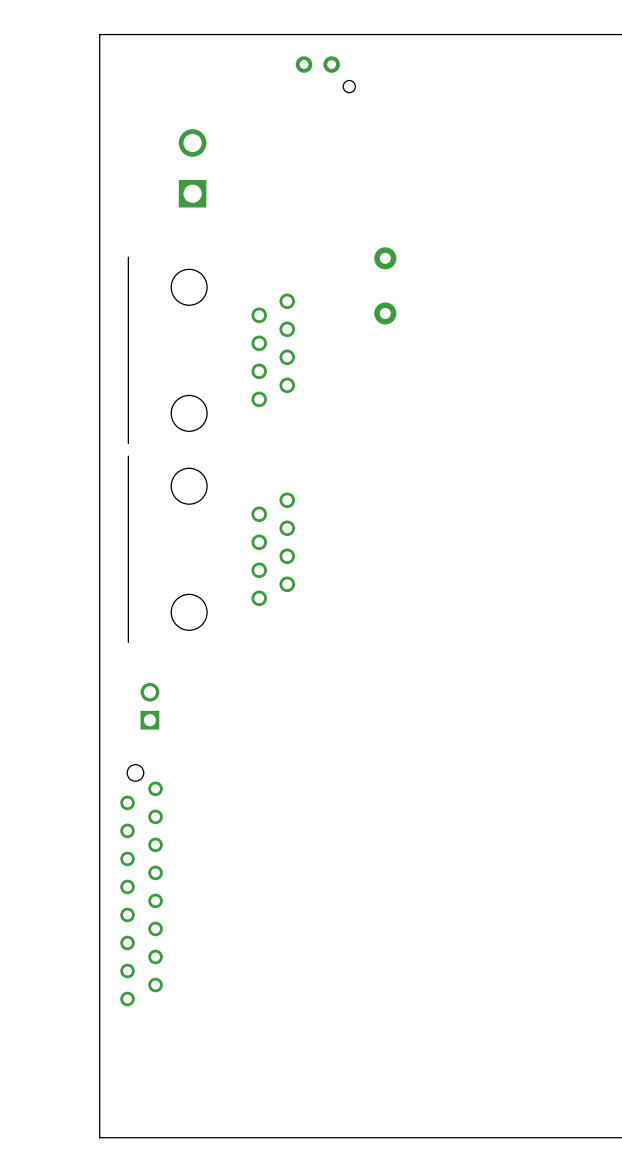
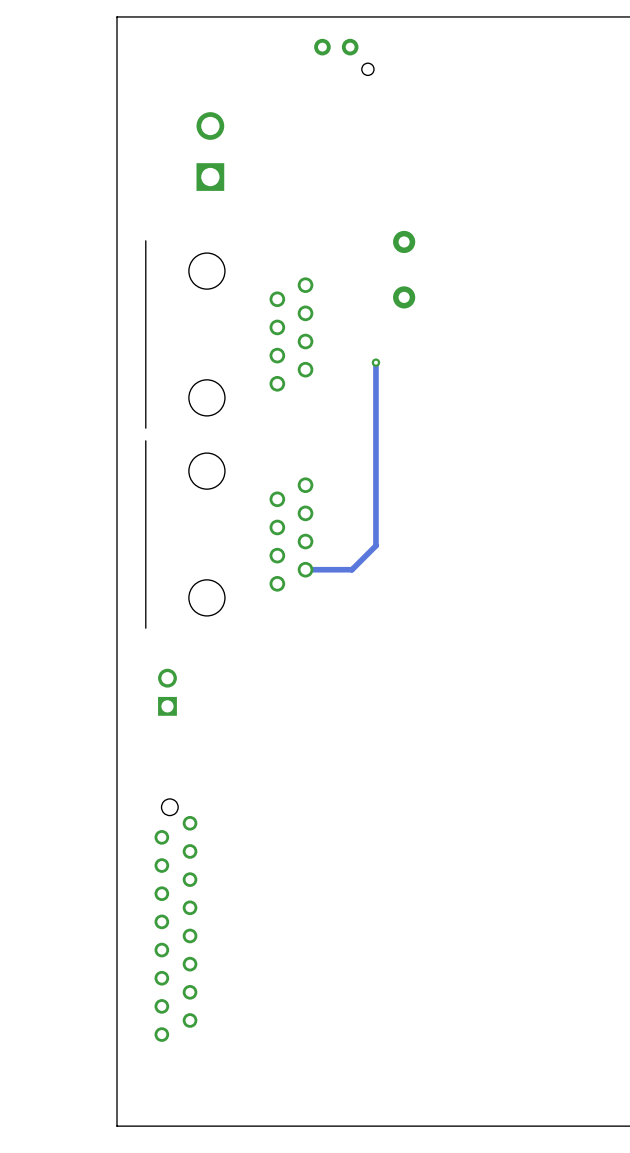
track: none -> (375, 362) (375, 545) (352, 569) (305, 569)
via: none -> (375, 362)
part position: (141, 885) -> (175, 920)

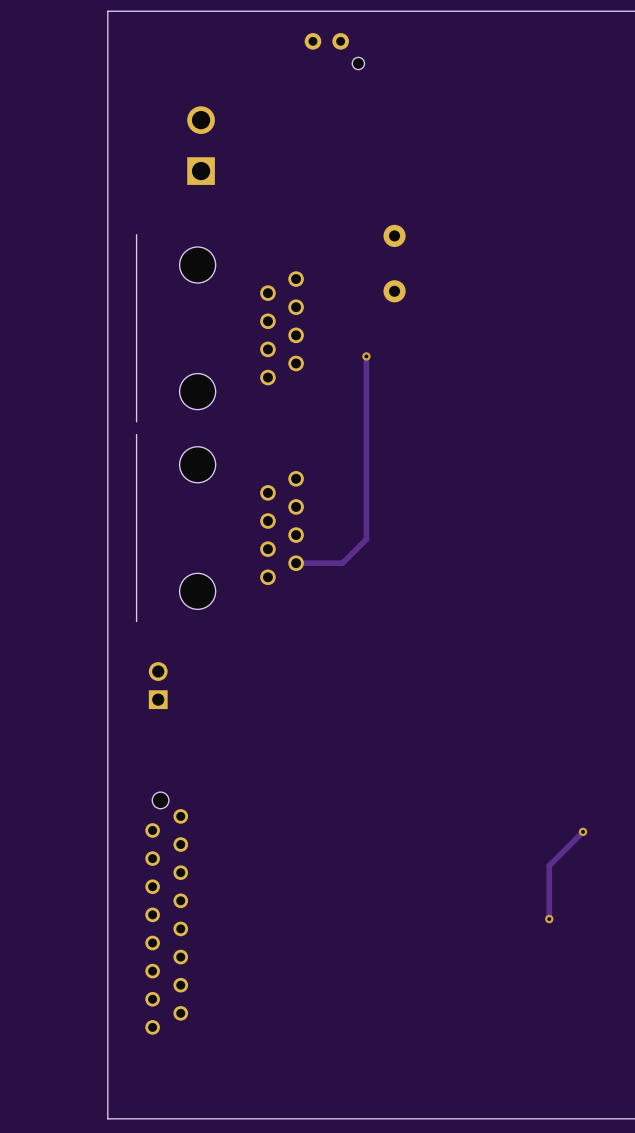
track: none -> (583, 831) (549, 865) (549, 919)
via: none -> (583, 831)
via: none -> (549, 919)

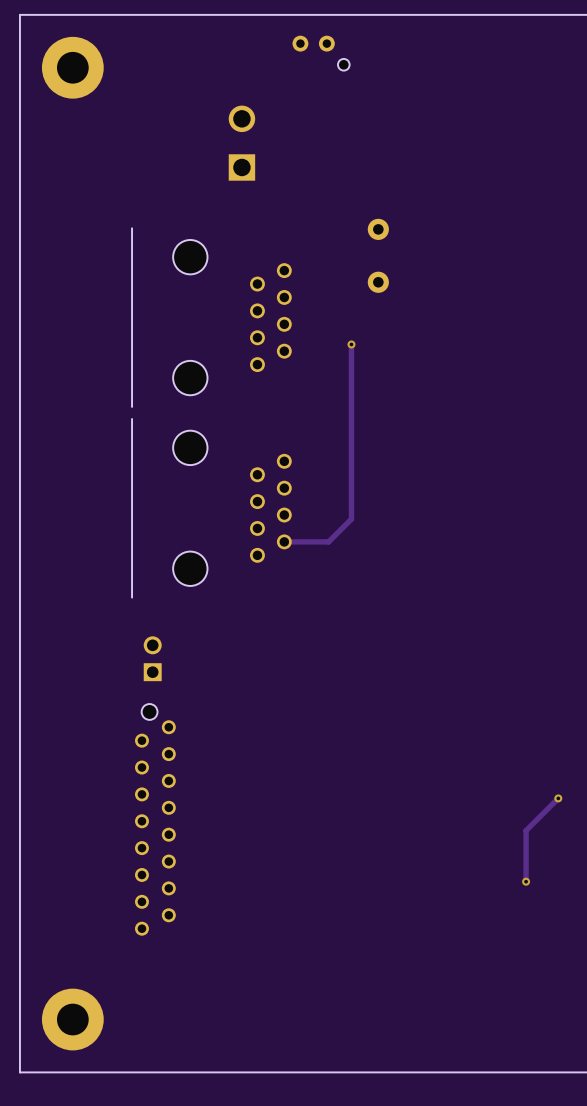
board edge: (107, 11) (107, 1118) -> (104, 14) (19, 14) (19, 1072) (104, 1072)
part: none -> (72, 67)
part position: (201, 145) -> (241, 143)
part position: (166, 913) -> (155, 819)
part: none -> (72, 1019)

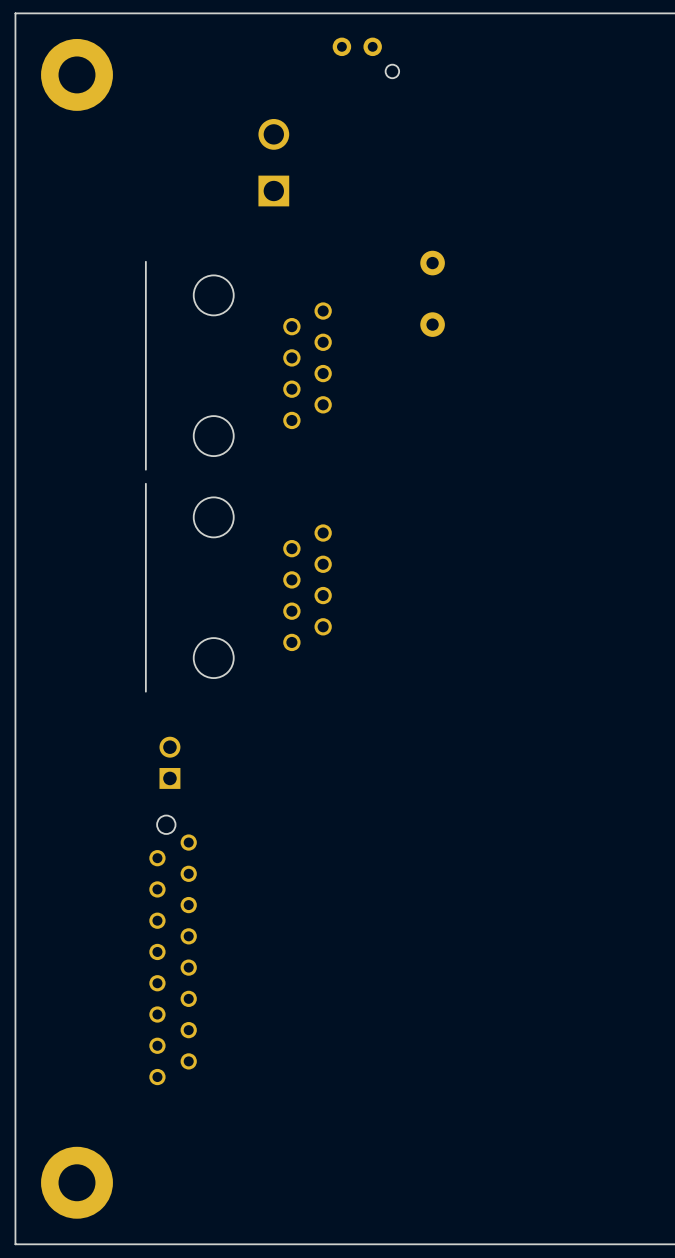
track: (351, 344) (351, 519) (328, 541) (284, 541) -> none
via: (351, 344) -> none
track: (558, 798) (526, 830) (526, 881) -> none
via: (558, 798) -> none
via: (526, 881) -> none

